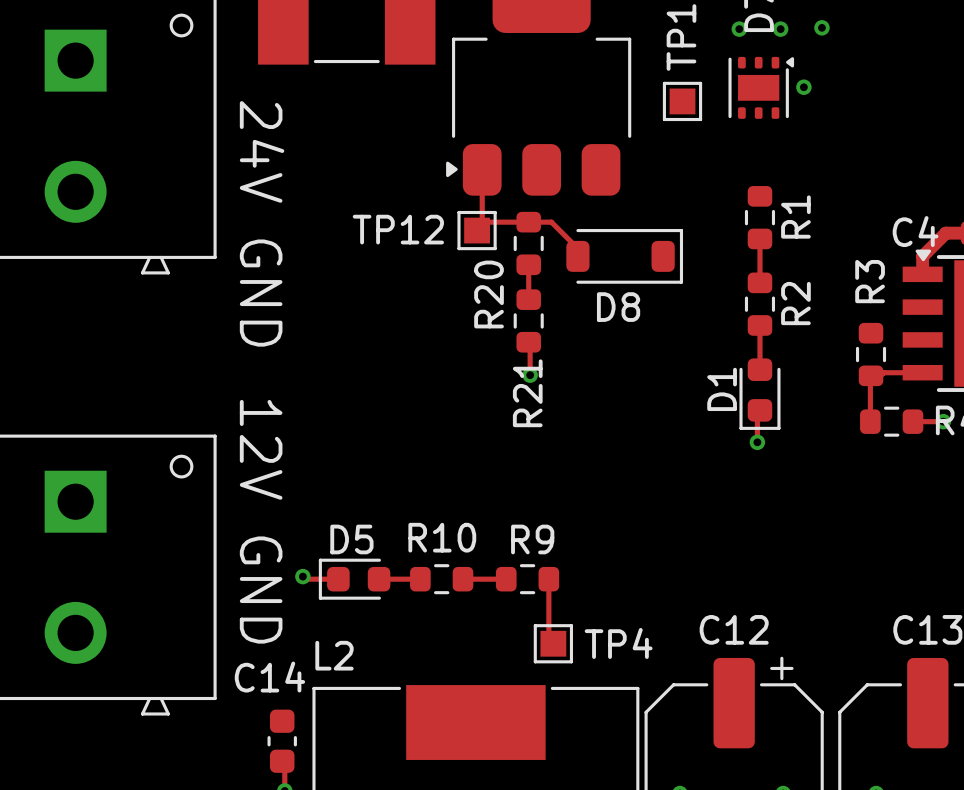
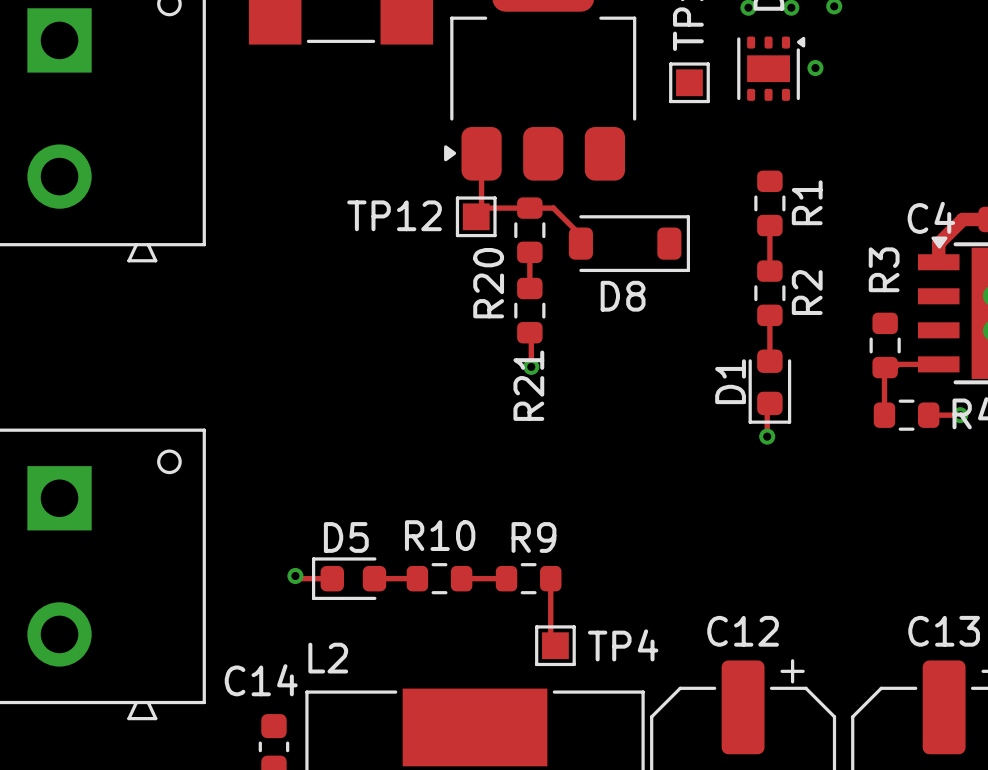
text: 24V GND (262, 223) -> none
text: 12V GND (261, 521) -> none

